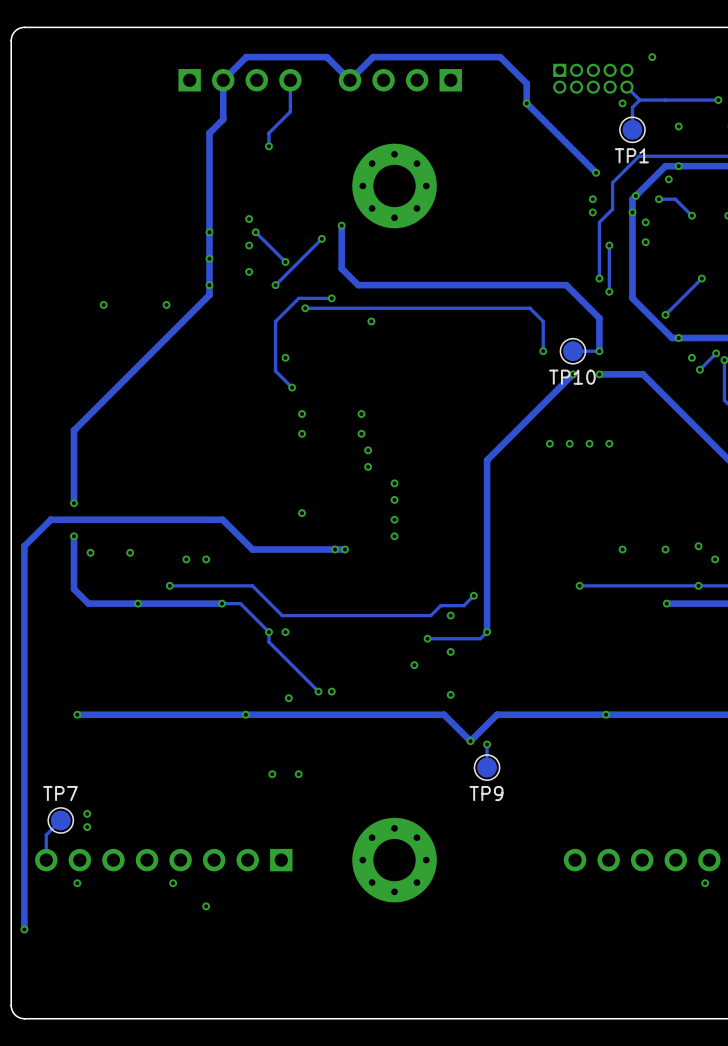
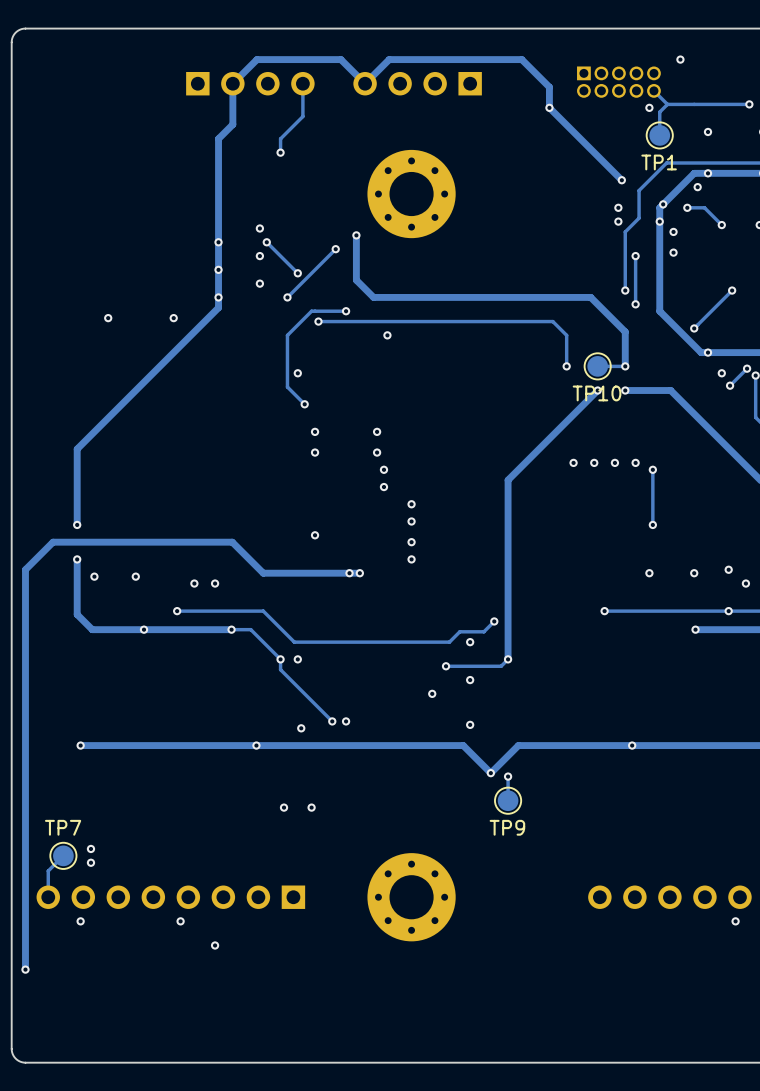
track: none -> (652, 469) (652, 524)
via: none -> (652, 469)
via: none -> (652, 524)

